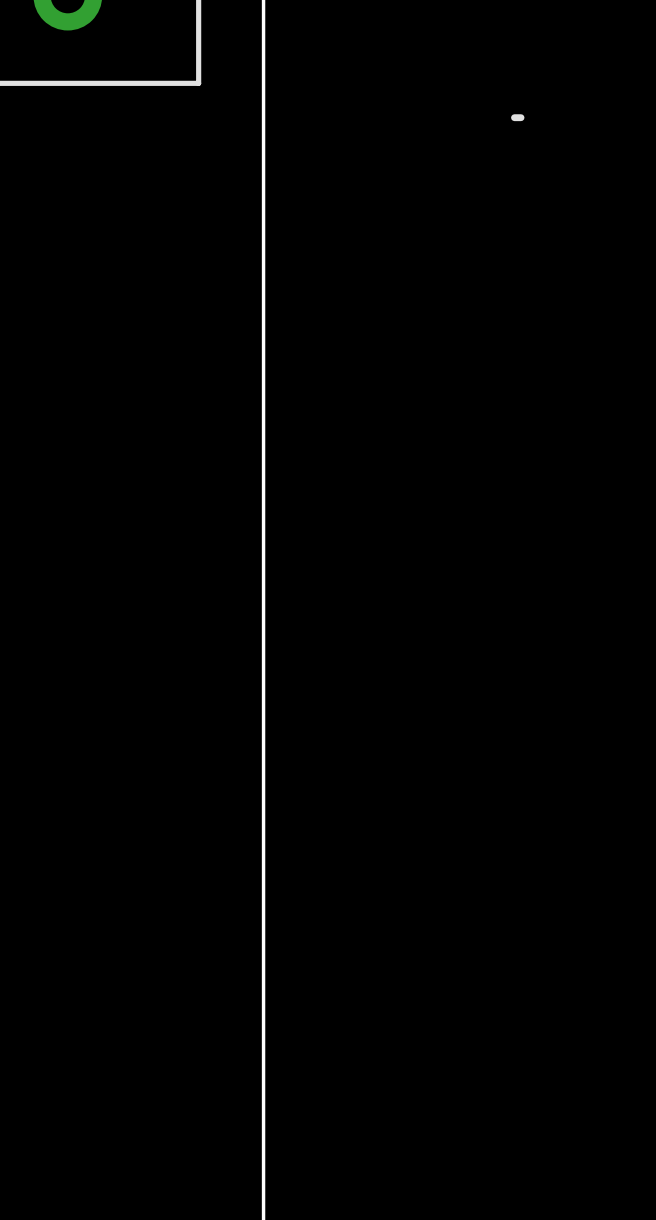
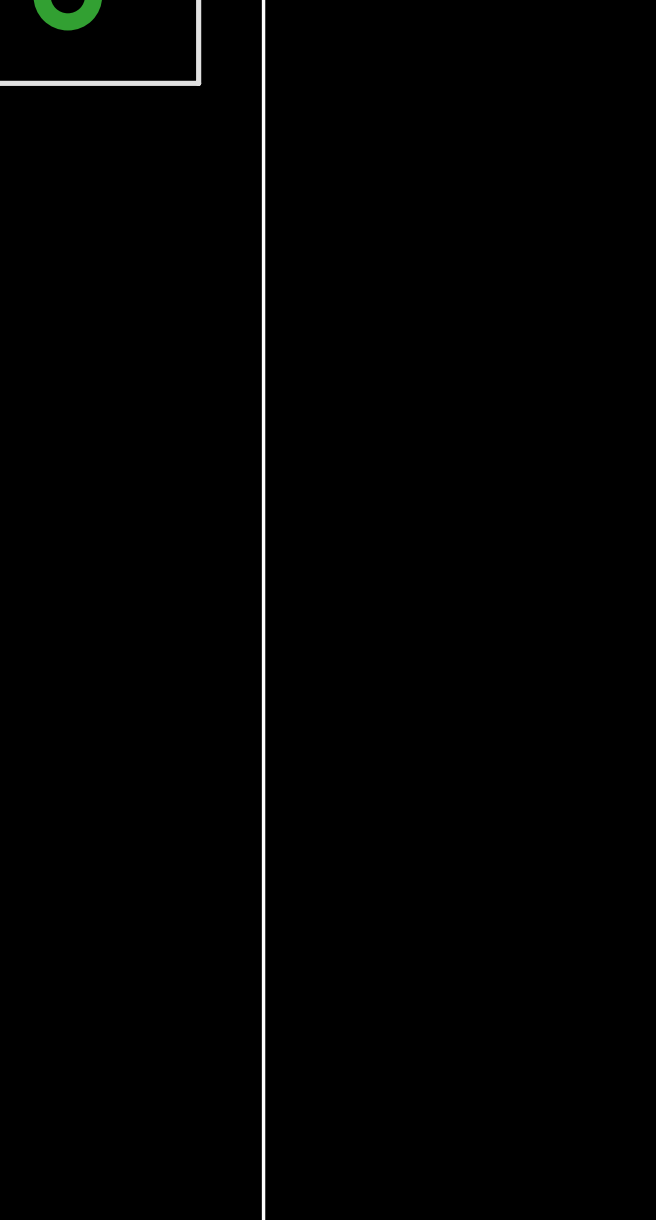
line: (514, 117) (521, 117) -> none

